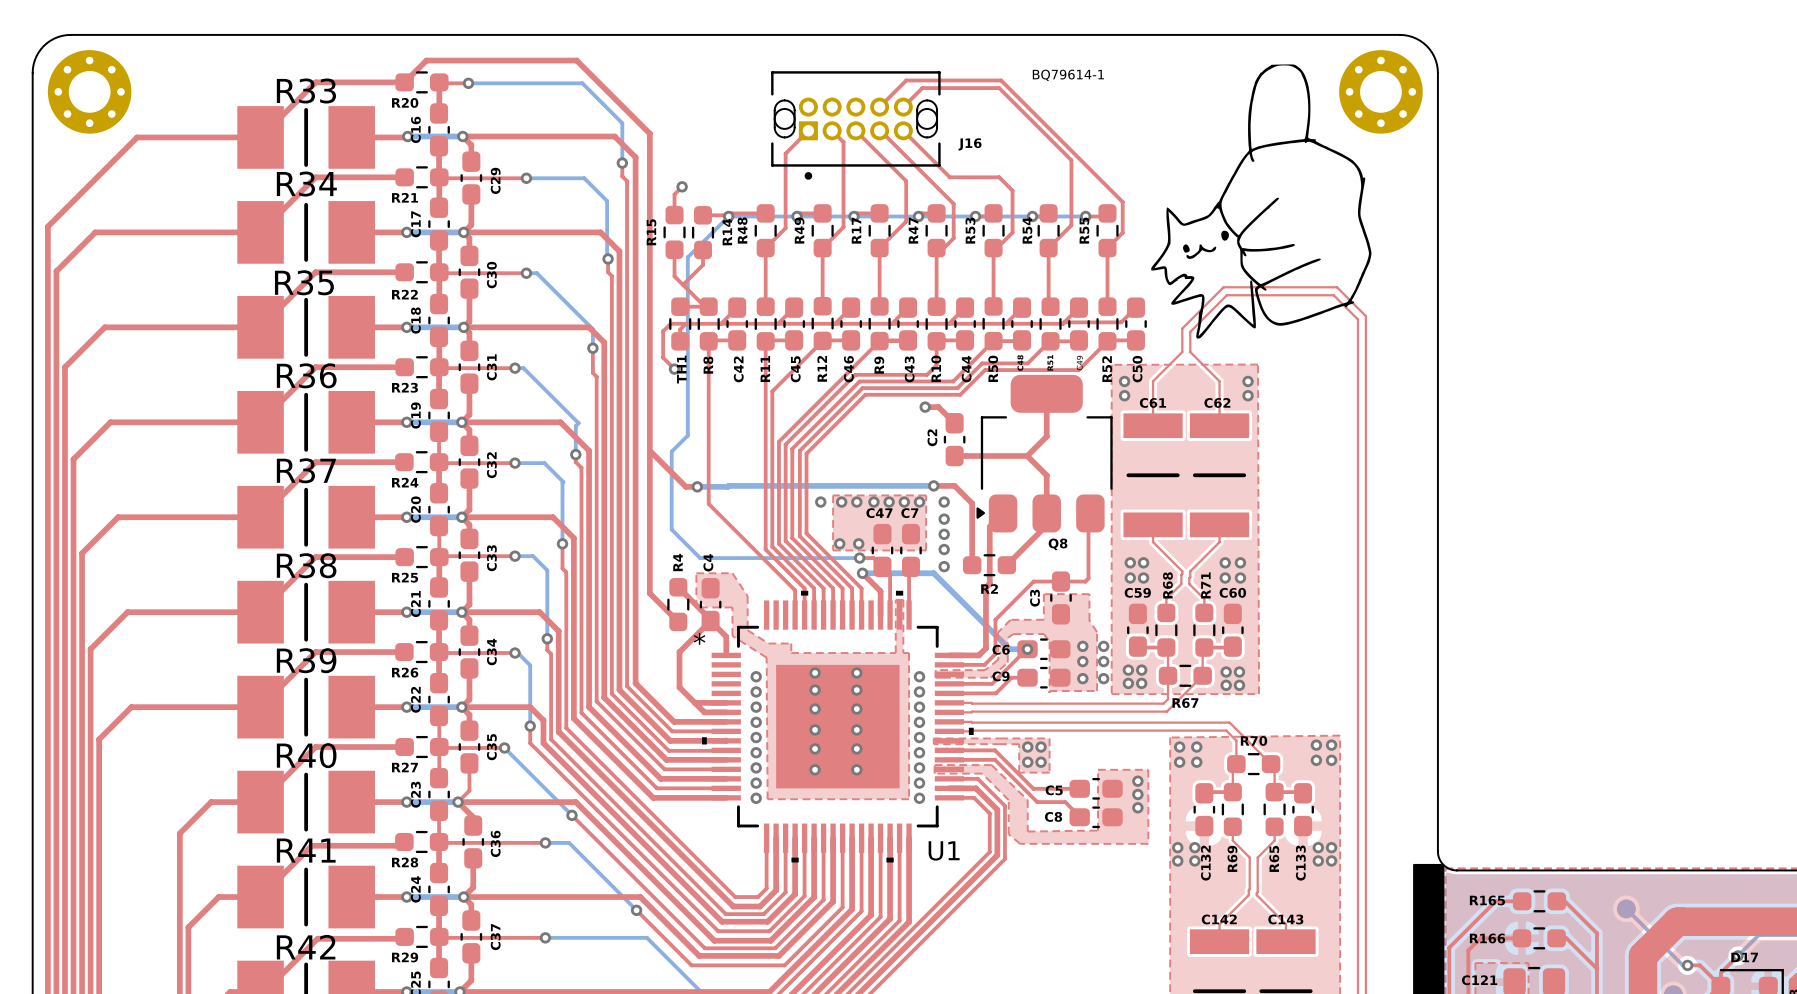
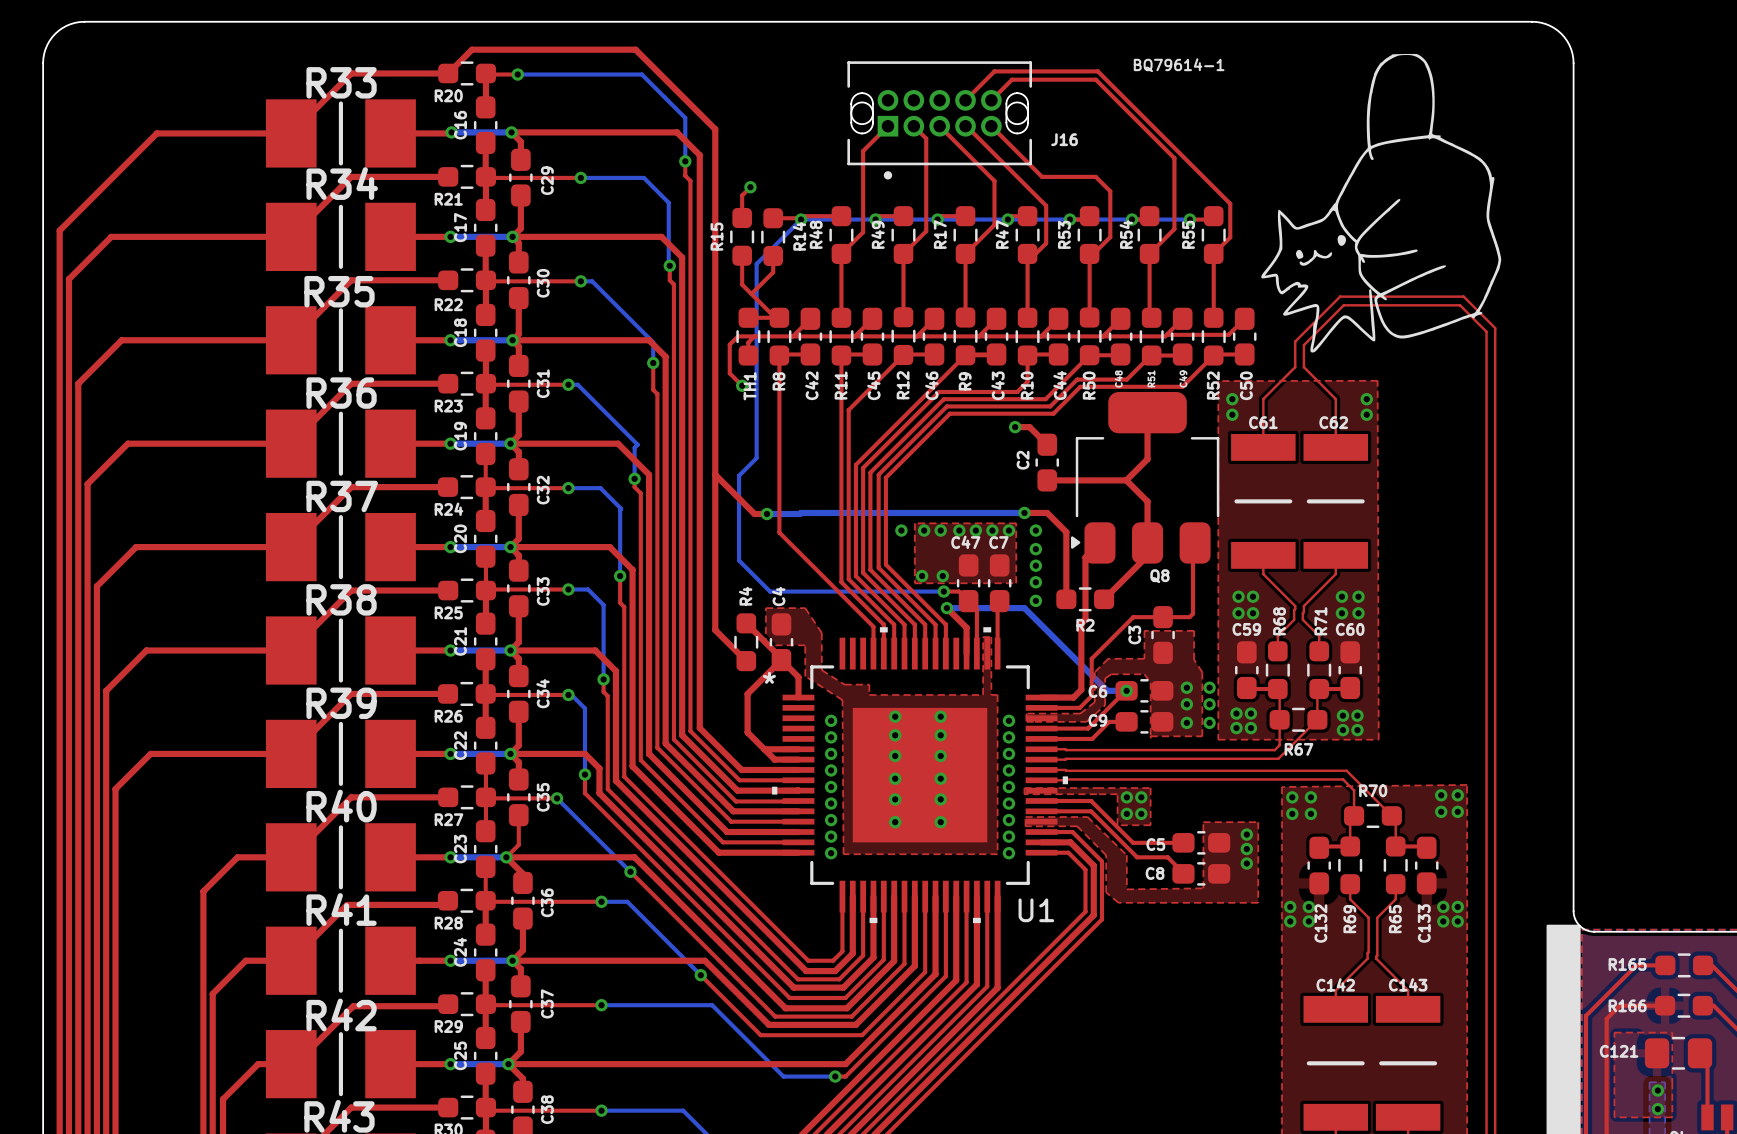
part: (89, 91) -> none
part: (1380, 91) -> none

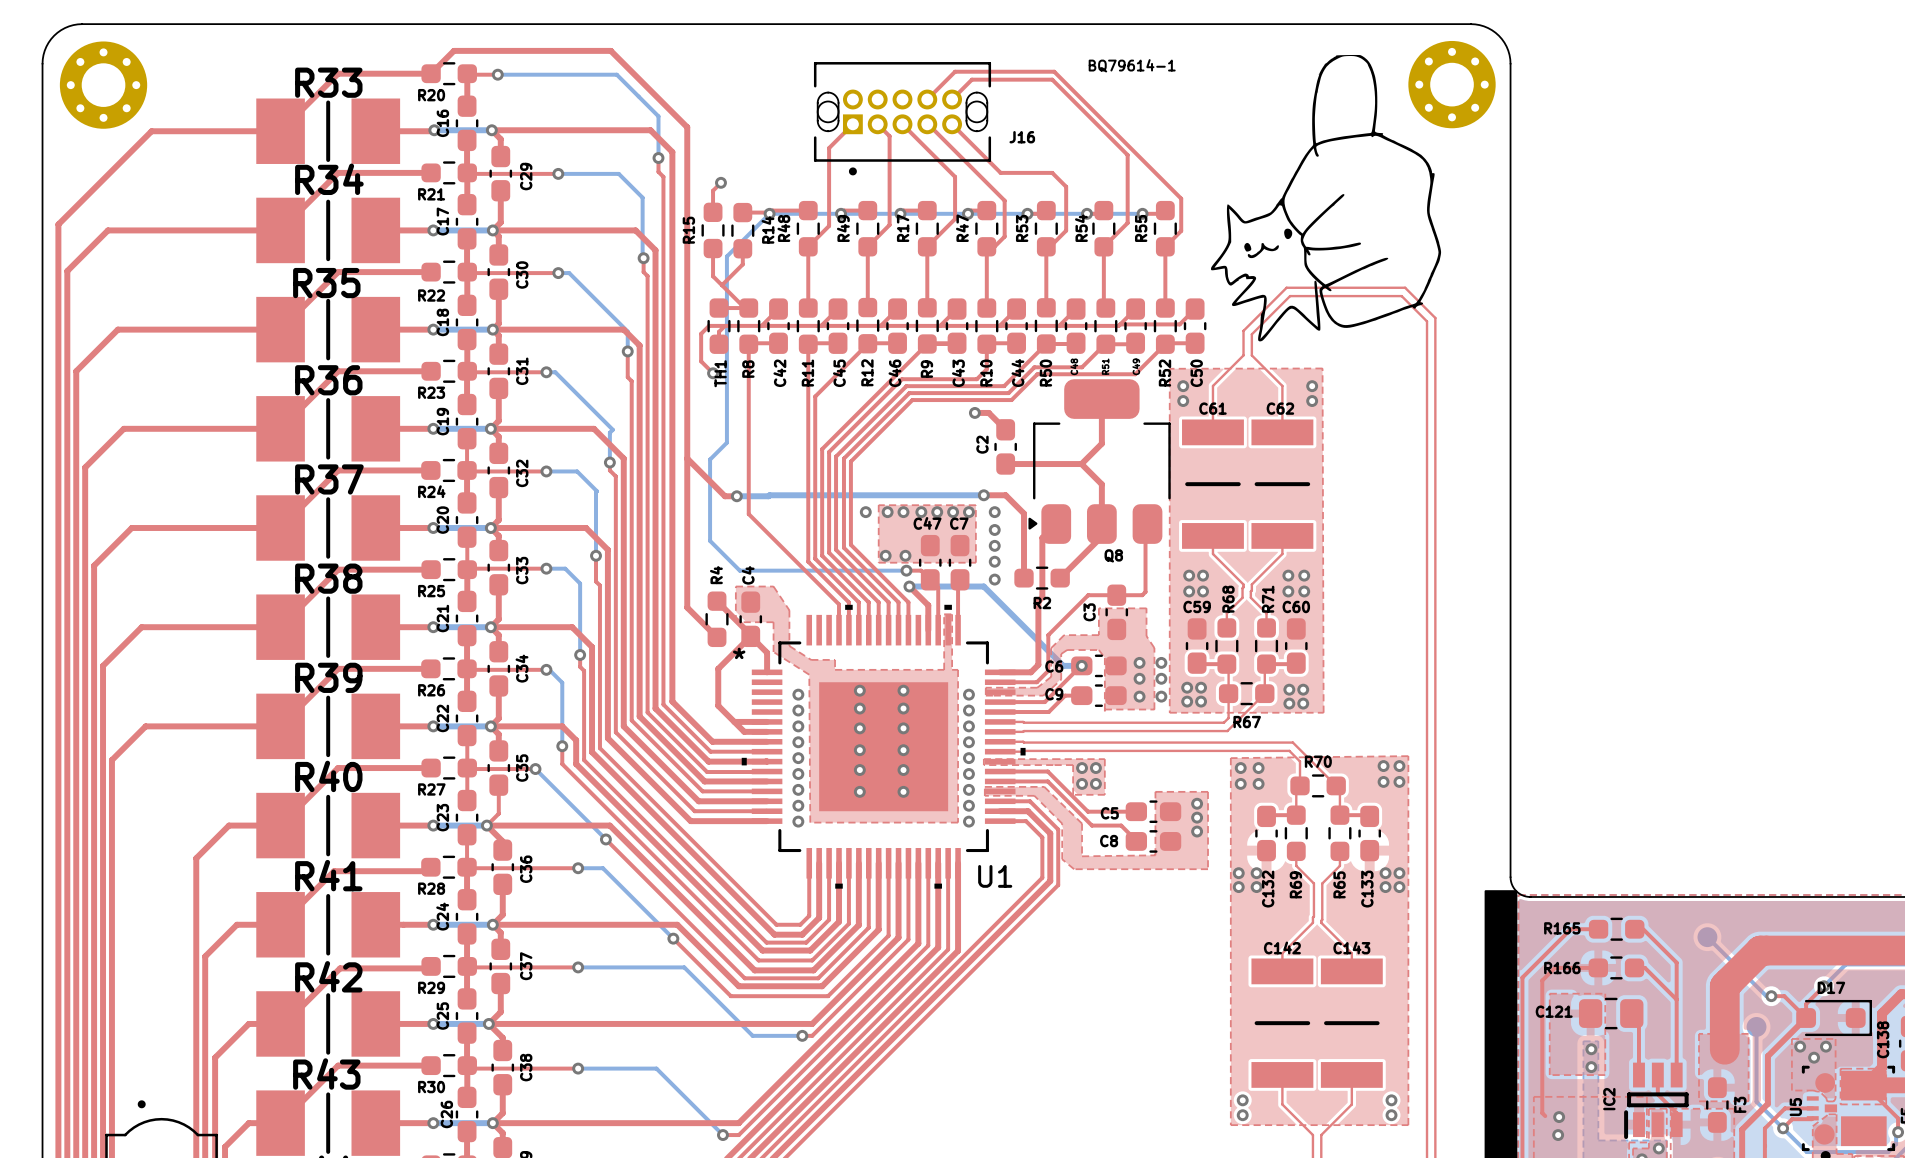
part: none -> (1452, 84)
part: none -> (103, 85)

